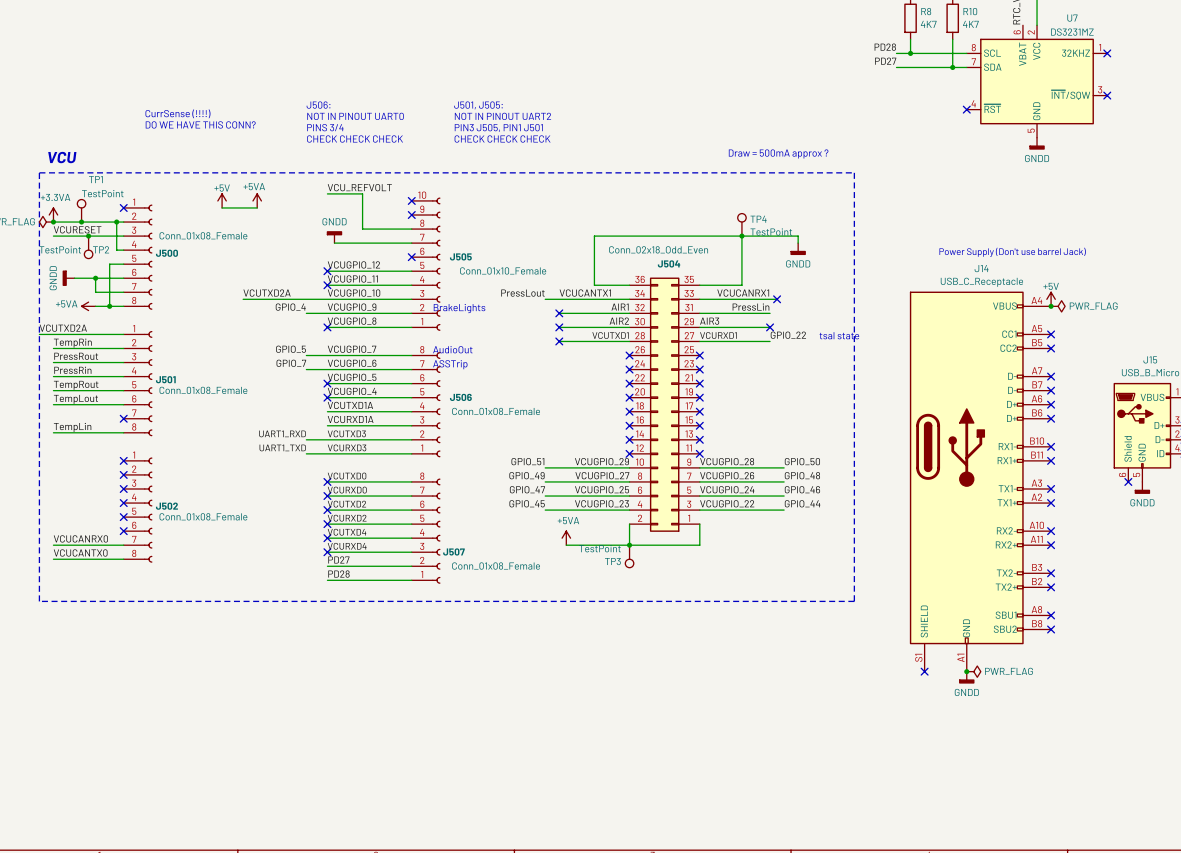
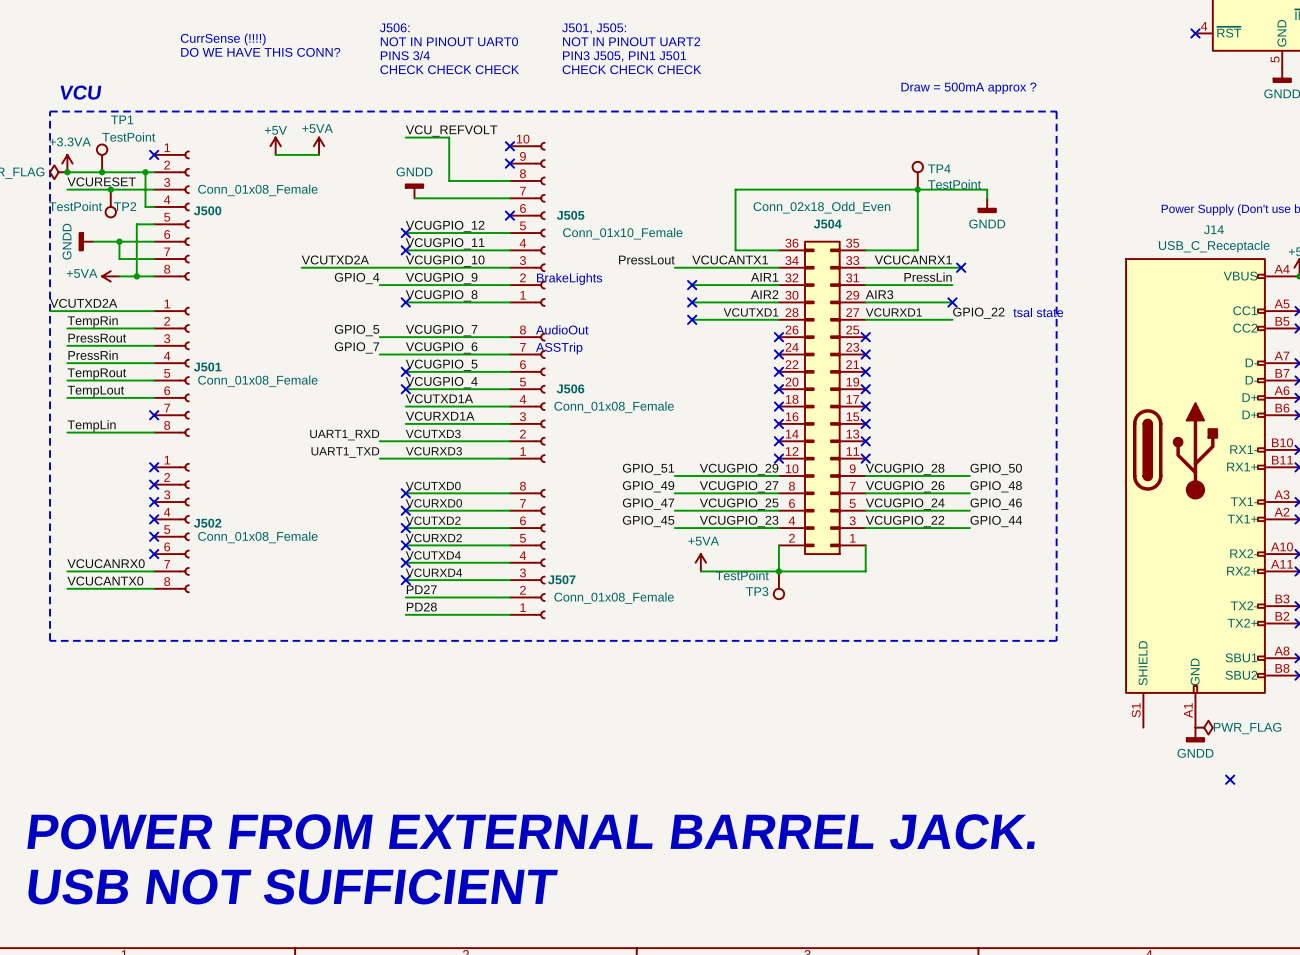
no-connect mark: (924, 671) -> none
junction: (966, 671) -> none
no-connect mark: none -> (1230, 779)
text: none -> POWER FROM EXTERNAL BARREL JACK. (531, 831)
text: none -> USB NOT SUFFICIENT (292, 886)

